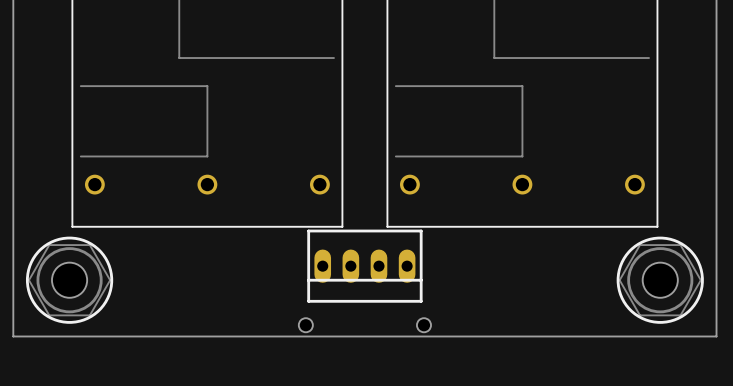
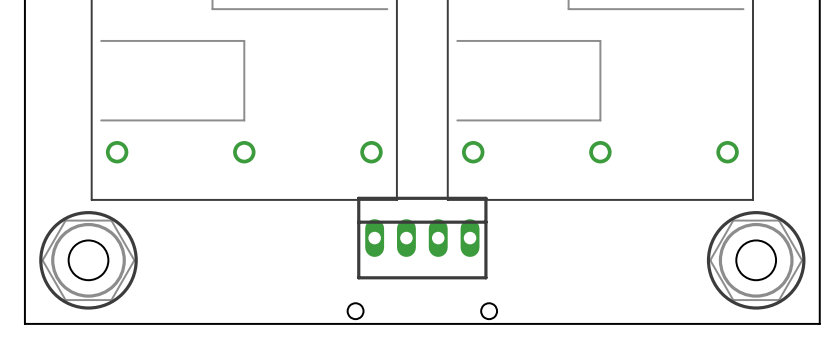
part footprint: [307, 229, 423, 303] -> [357, 196, 488, 280]

